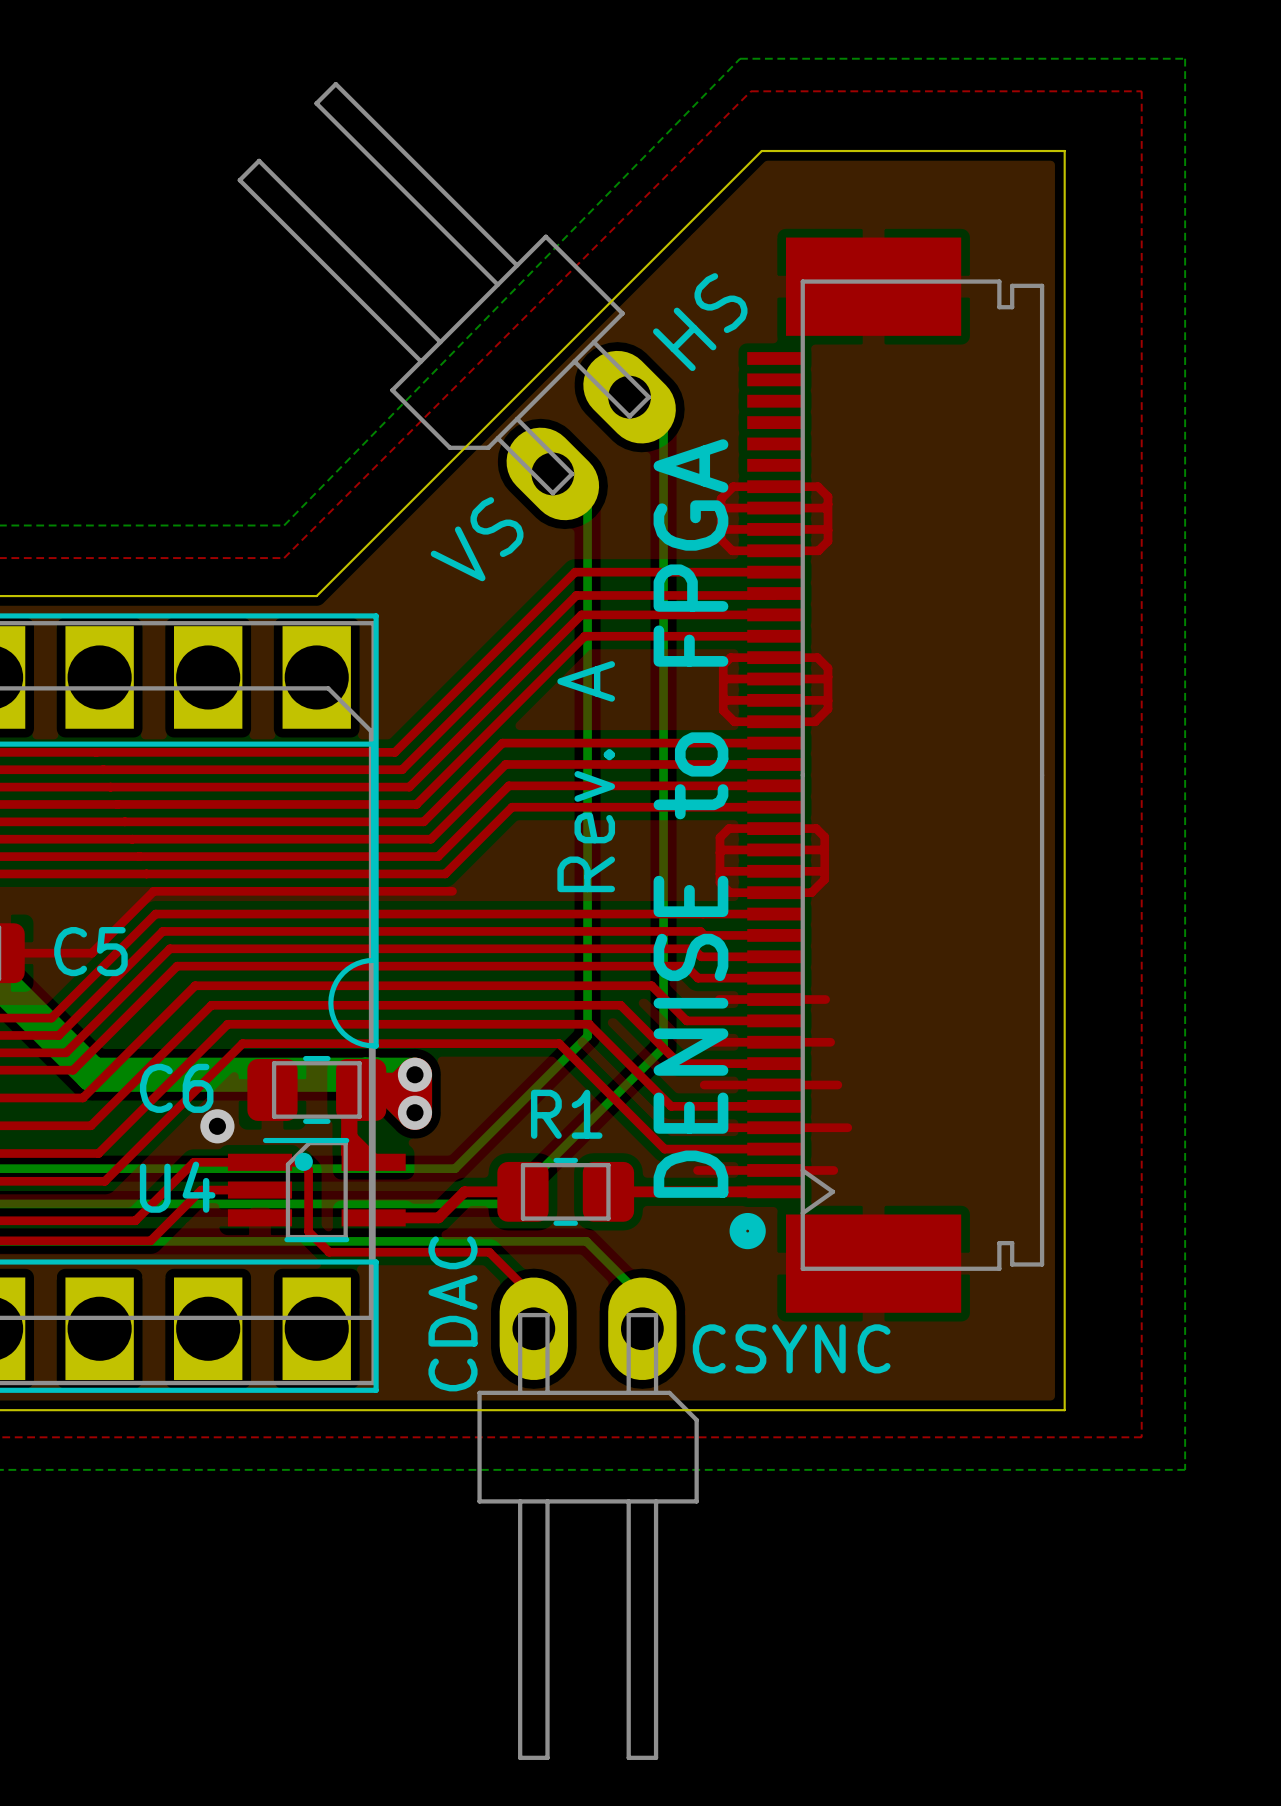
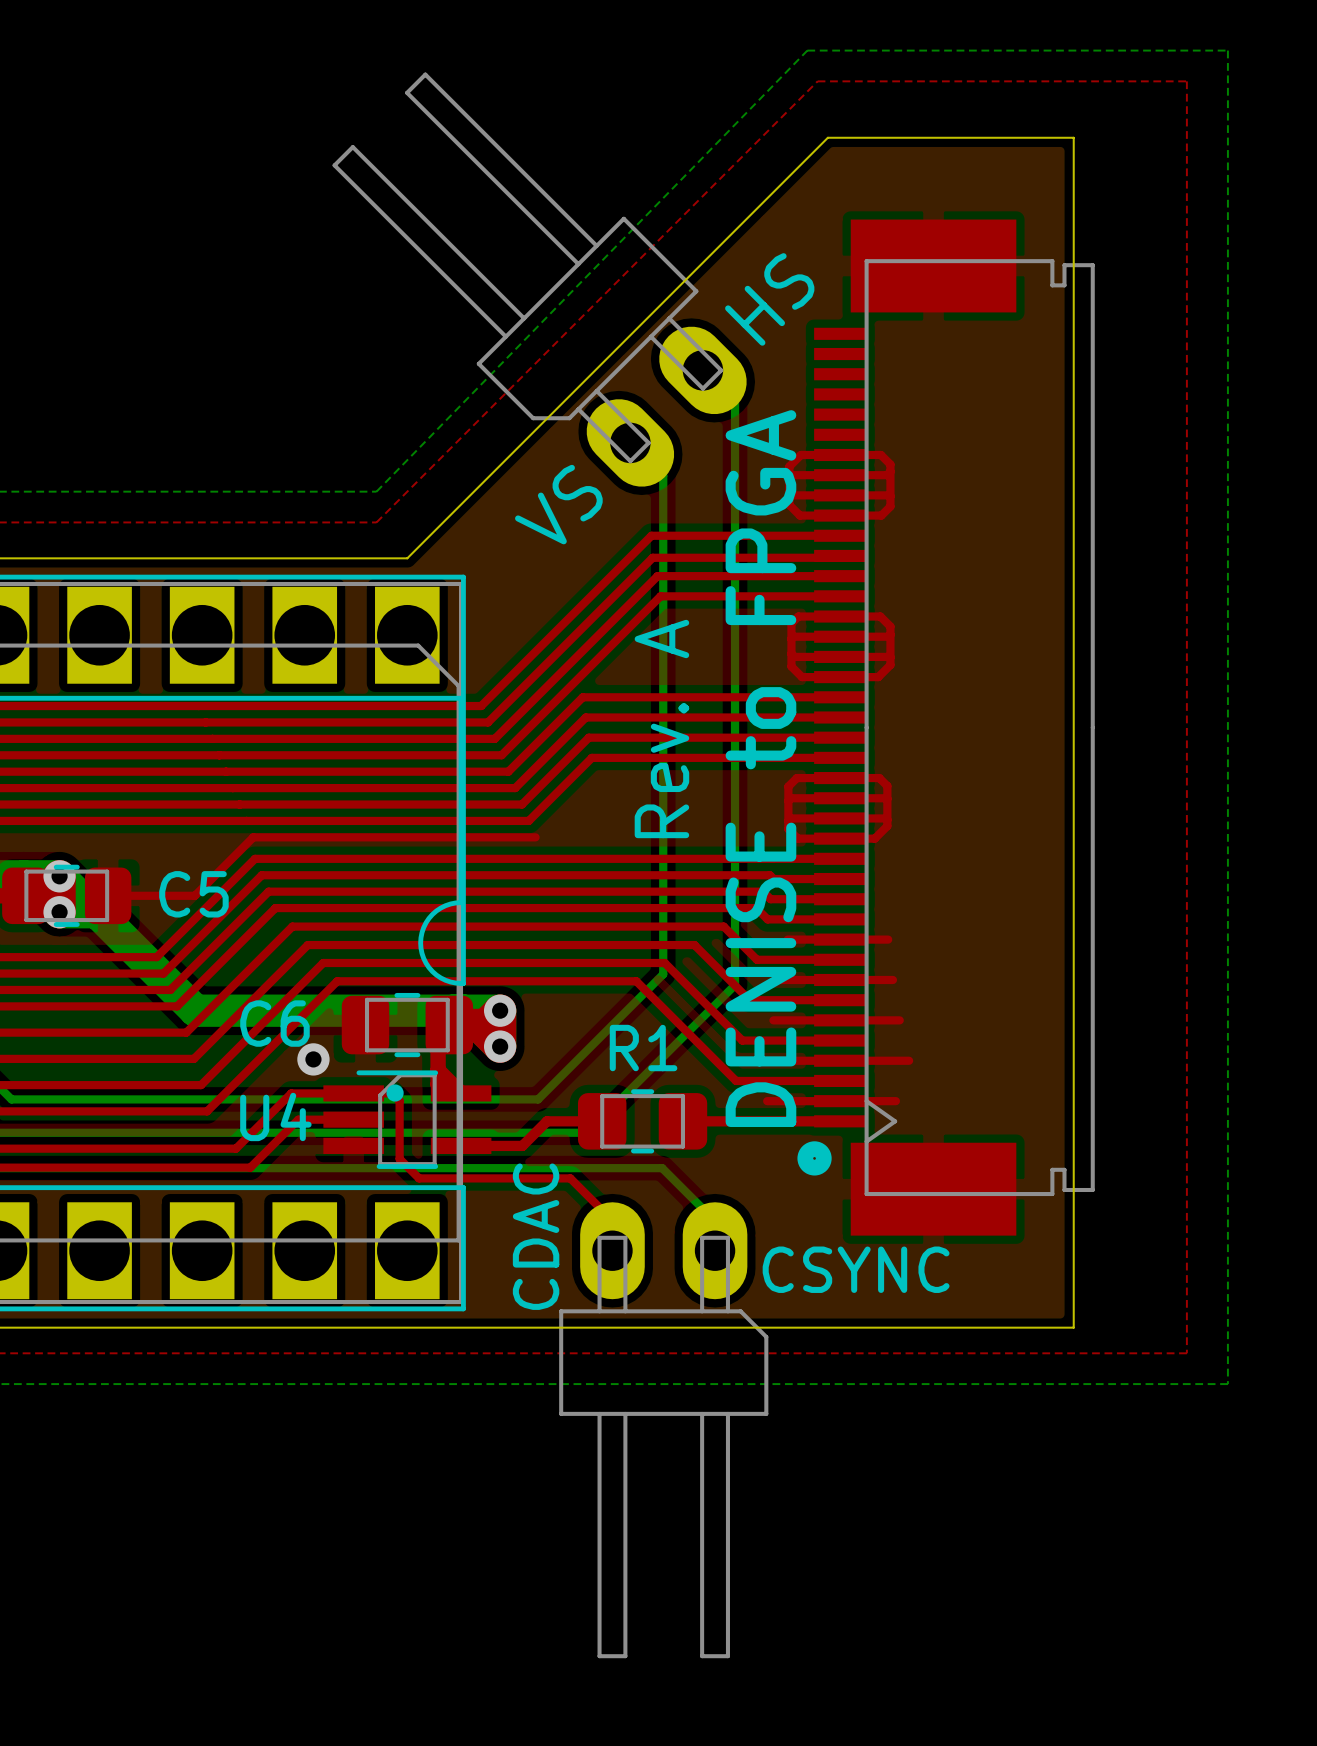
board edge: (1021, 151) (1064, 151) (1064, 1410) (1021, 1410) -> (1073, 137) (1073, 1327)

